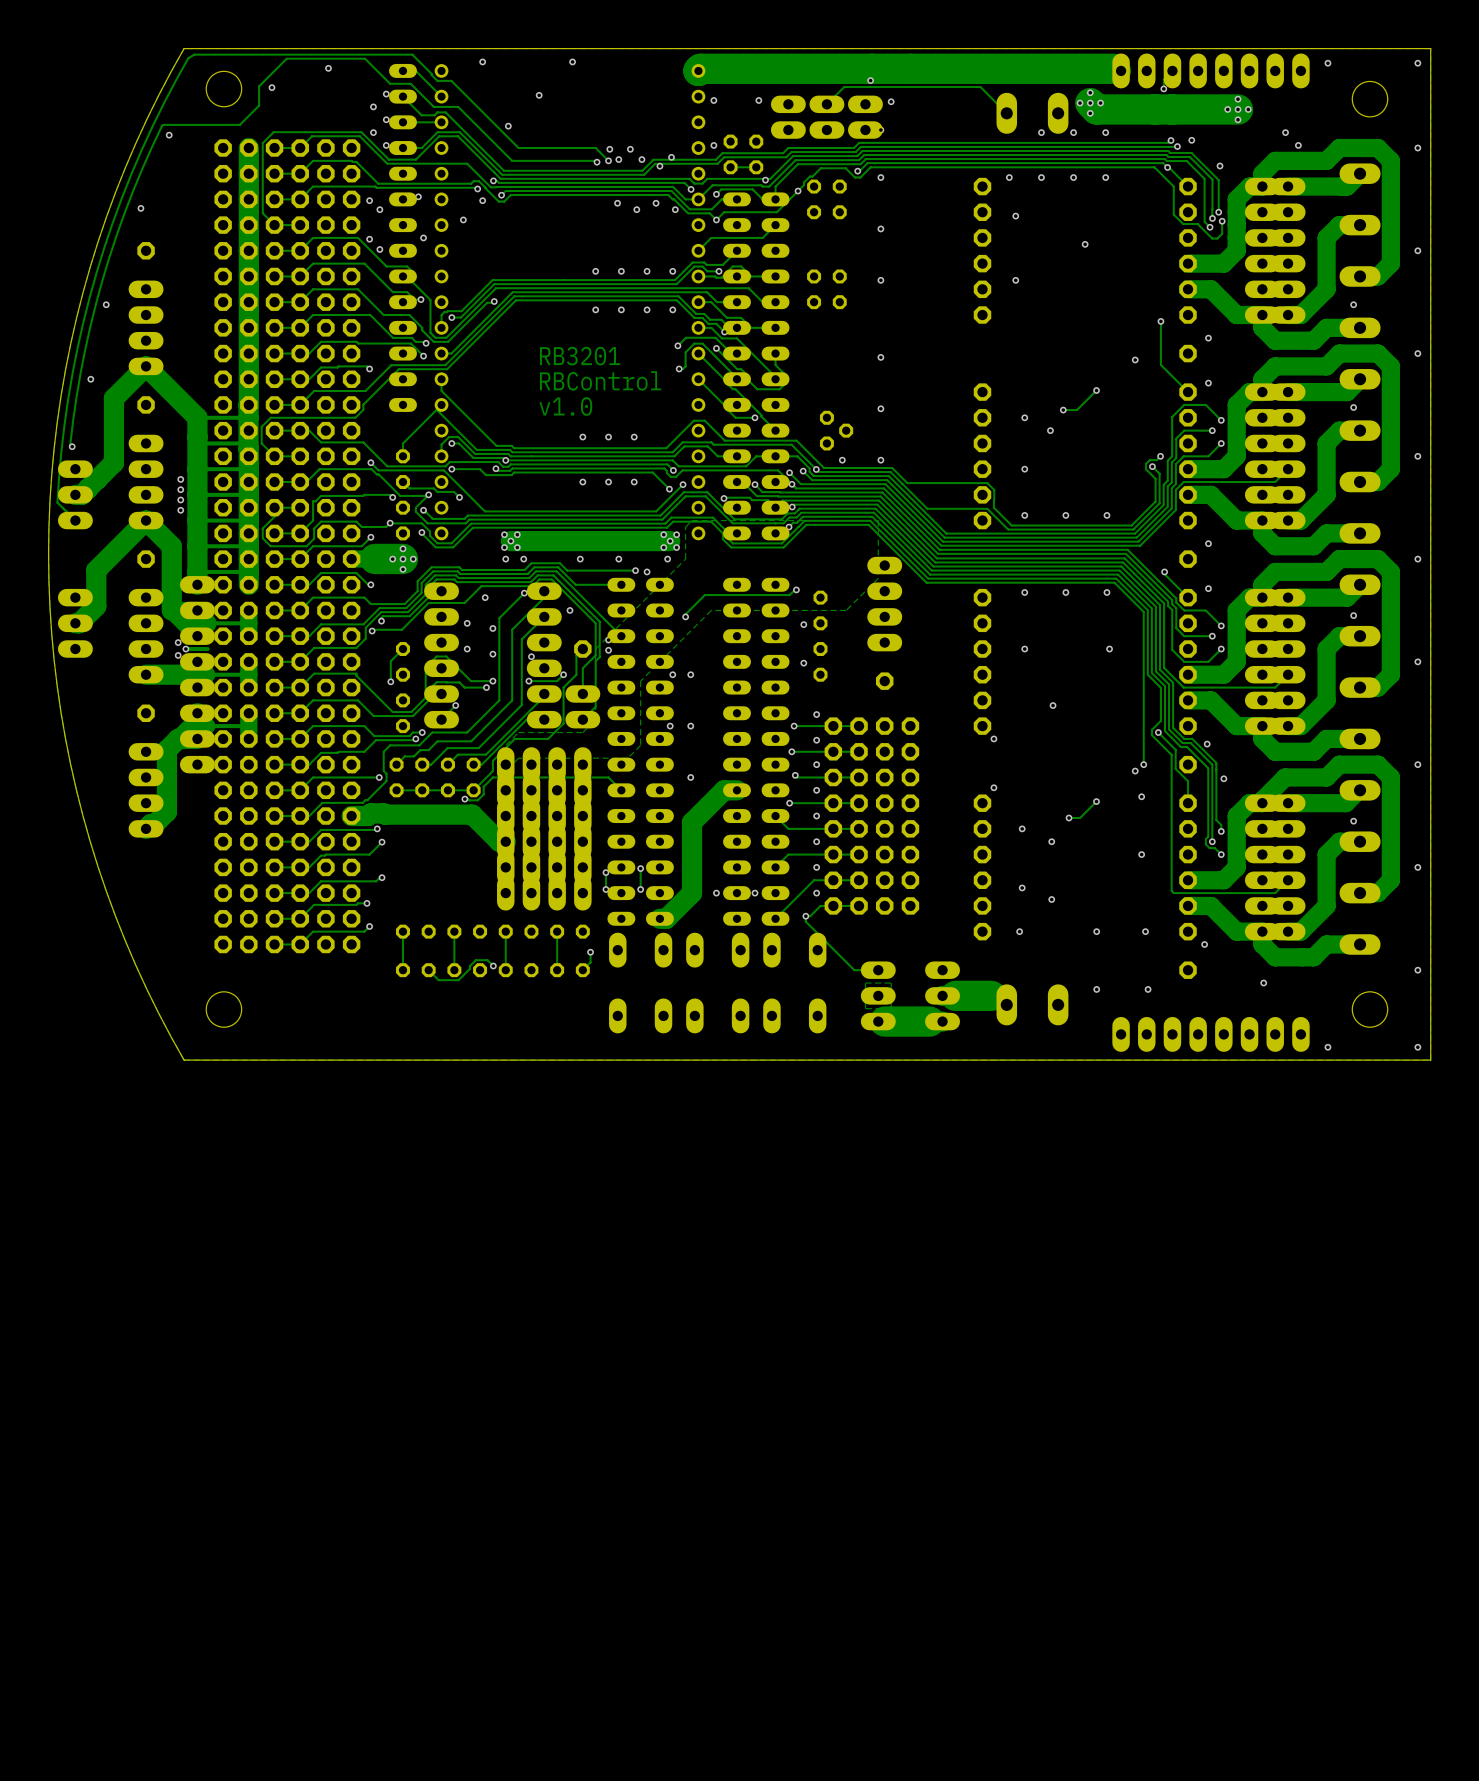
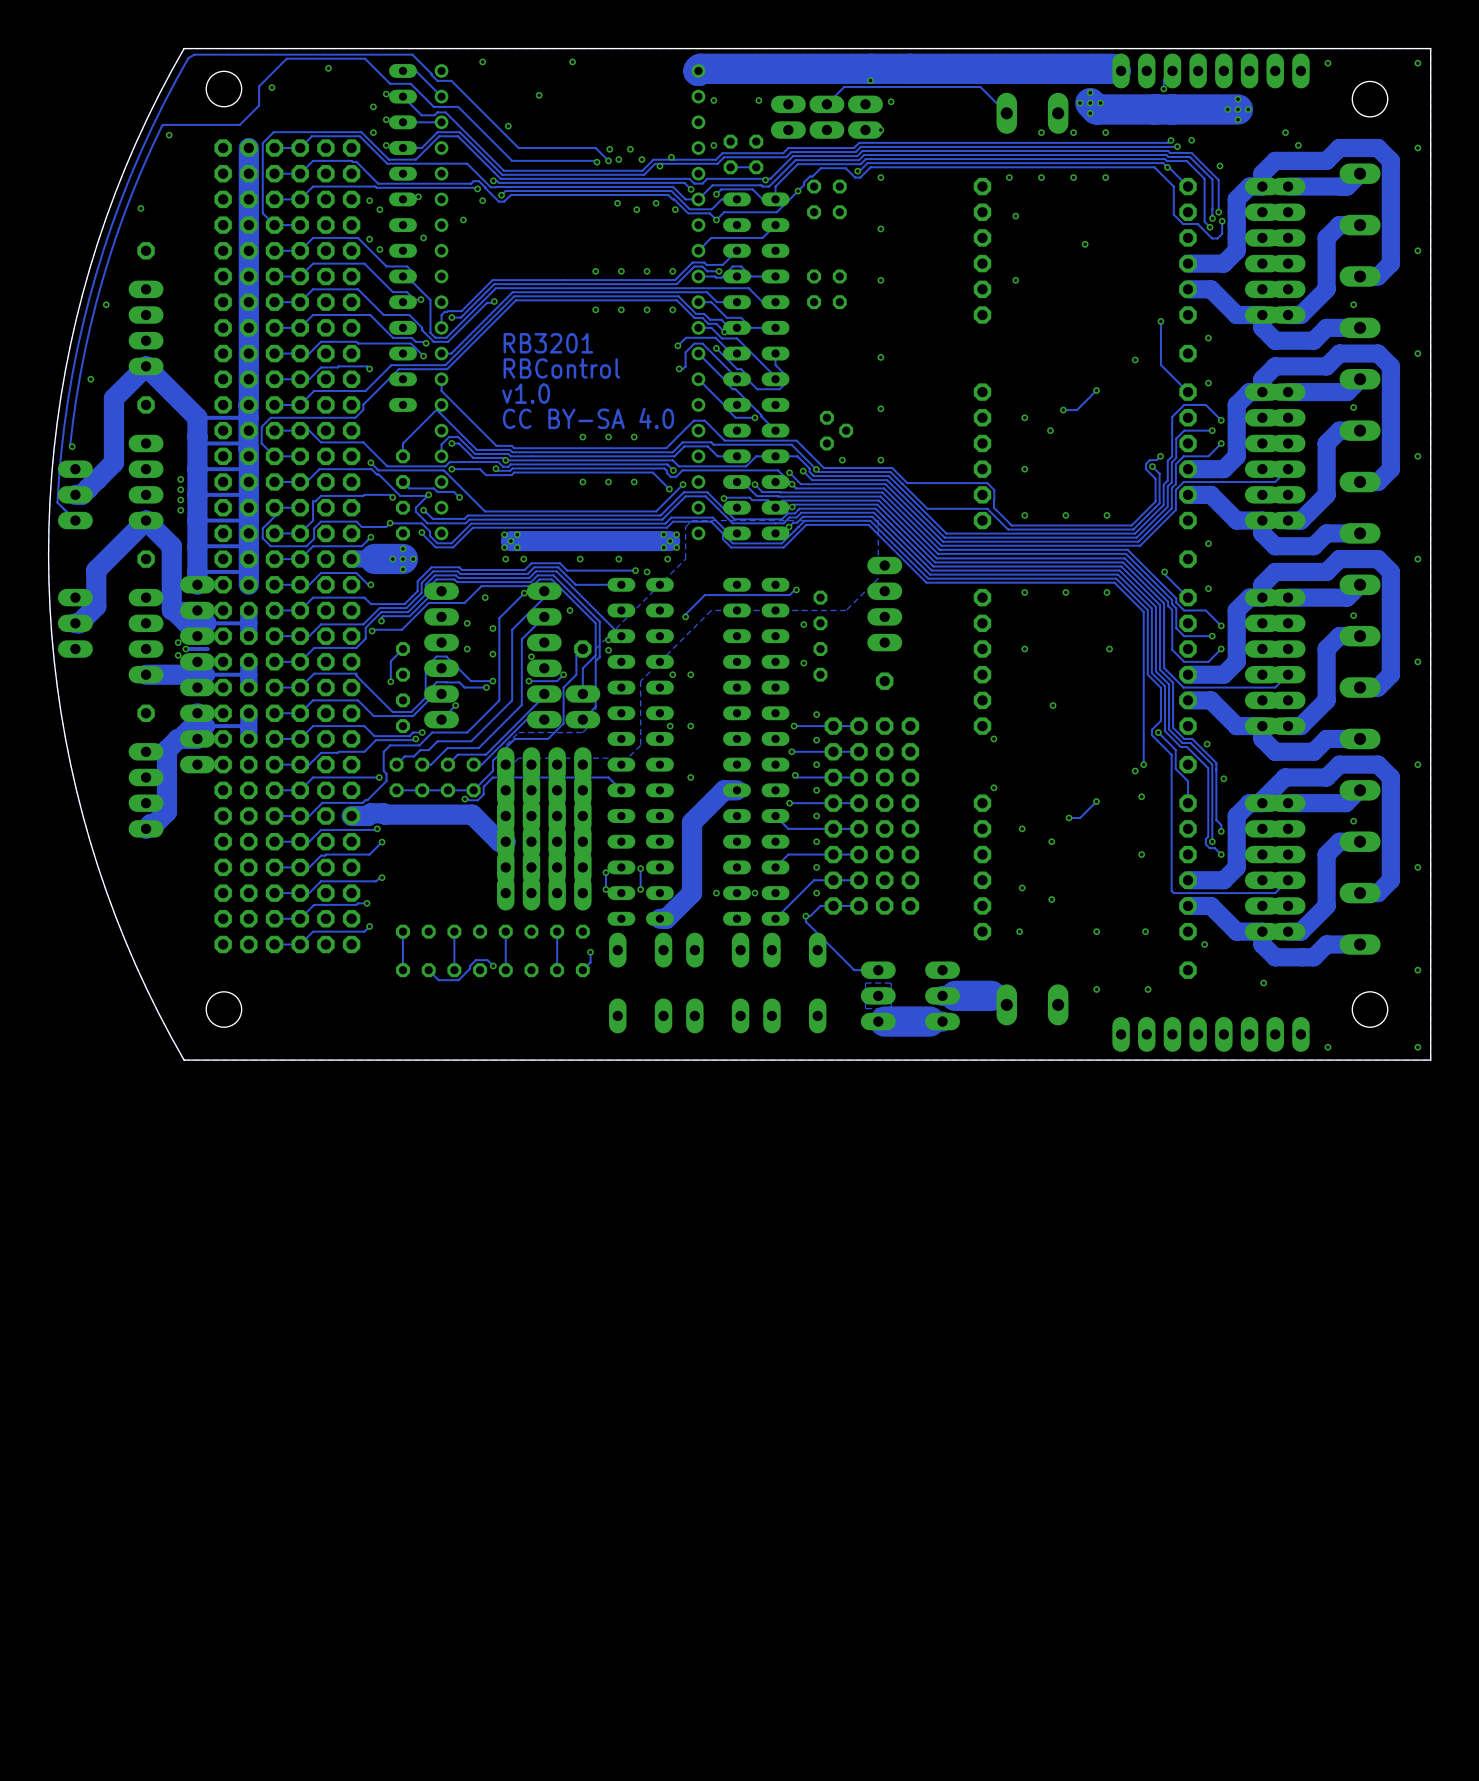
text position: RB3201 (580, 356) -> RB3201 (548, 343)
text position: RBControl (600, 380) -> RBControl (561, 368)
text position: v1.0 (565, 406) -> v1.0 (526, 393)
text: none -> CC BY-SA 4.0 (588, 418)

